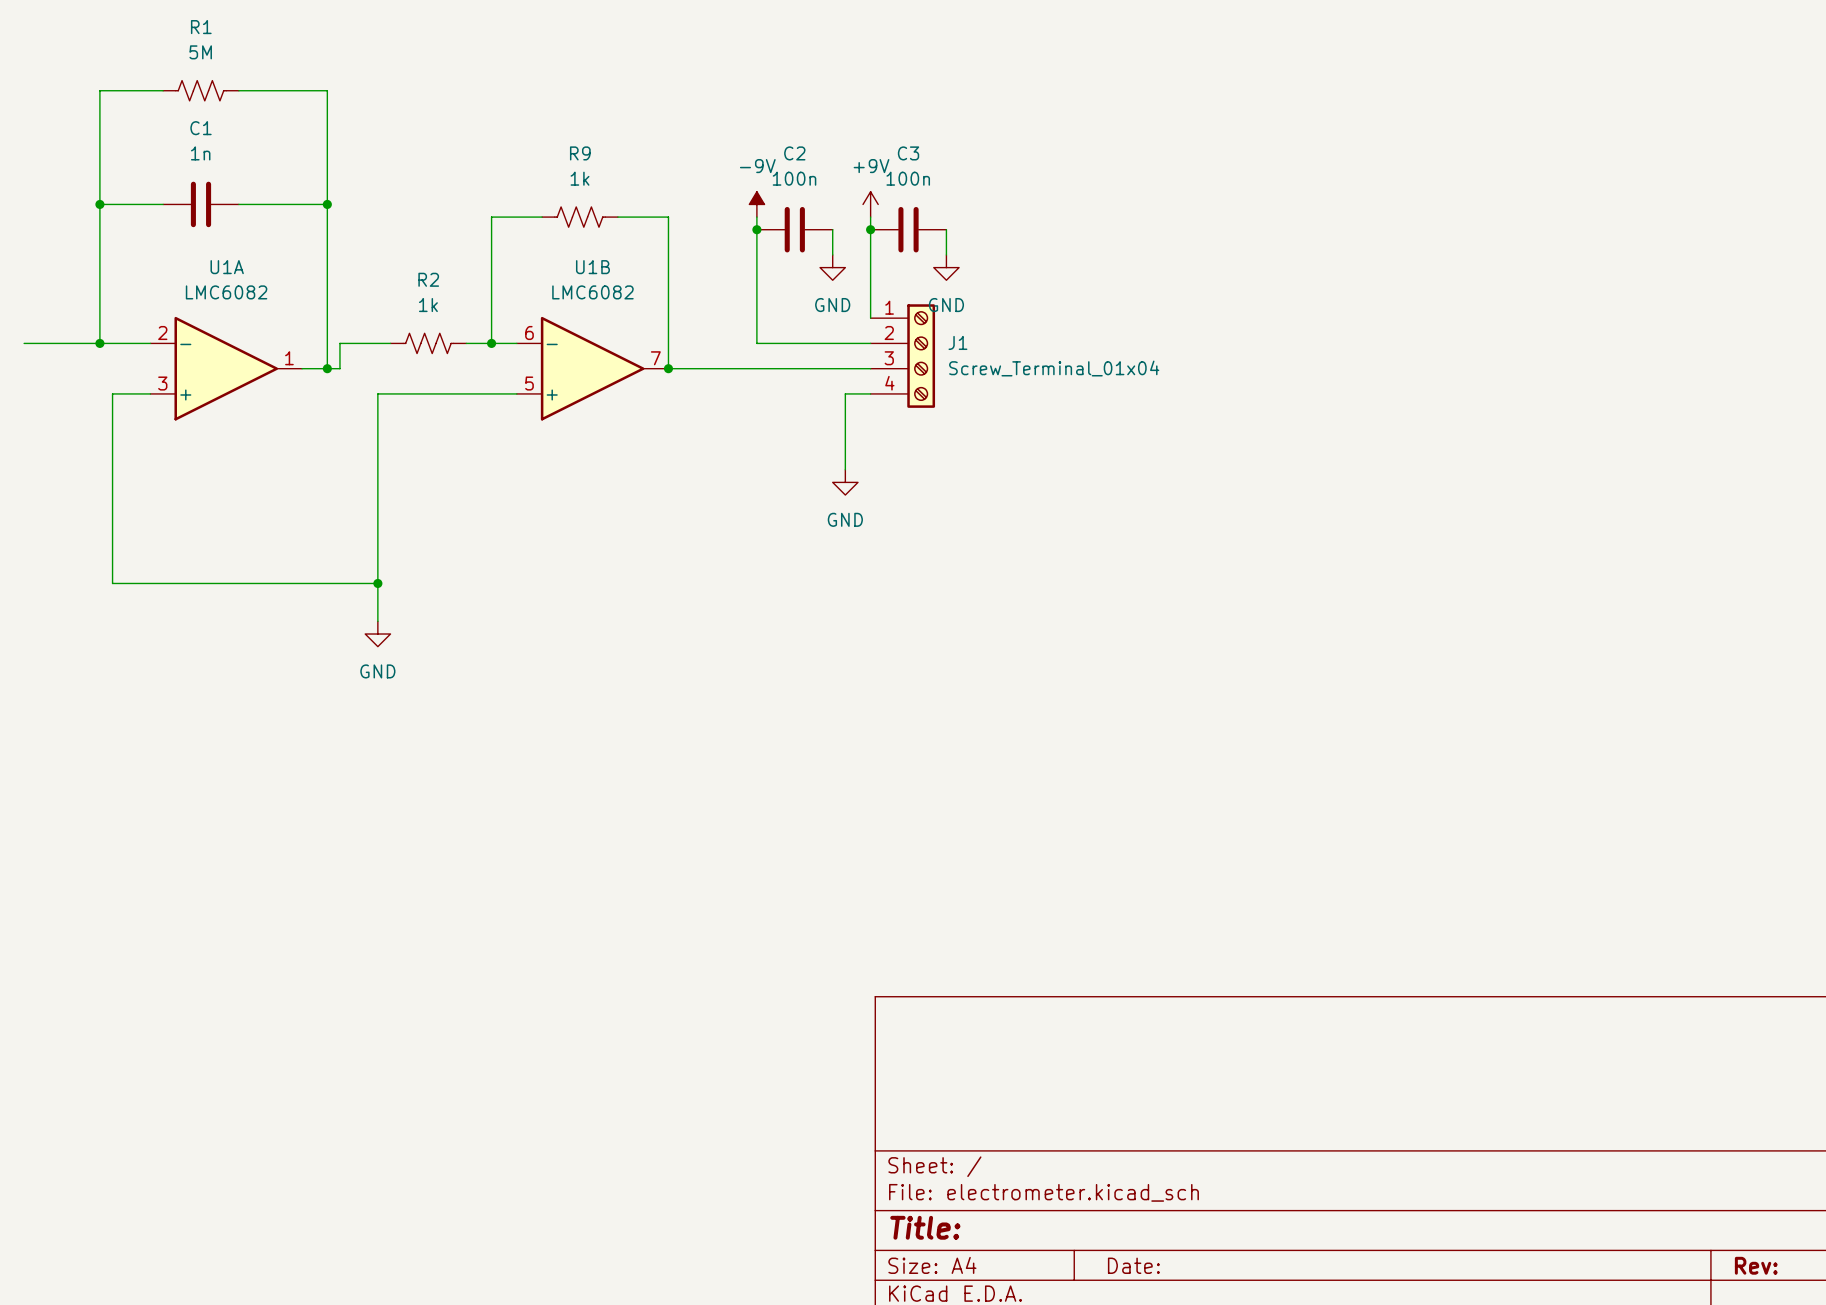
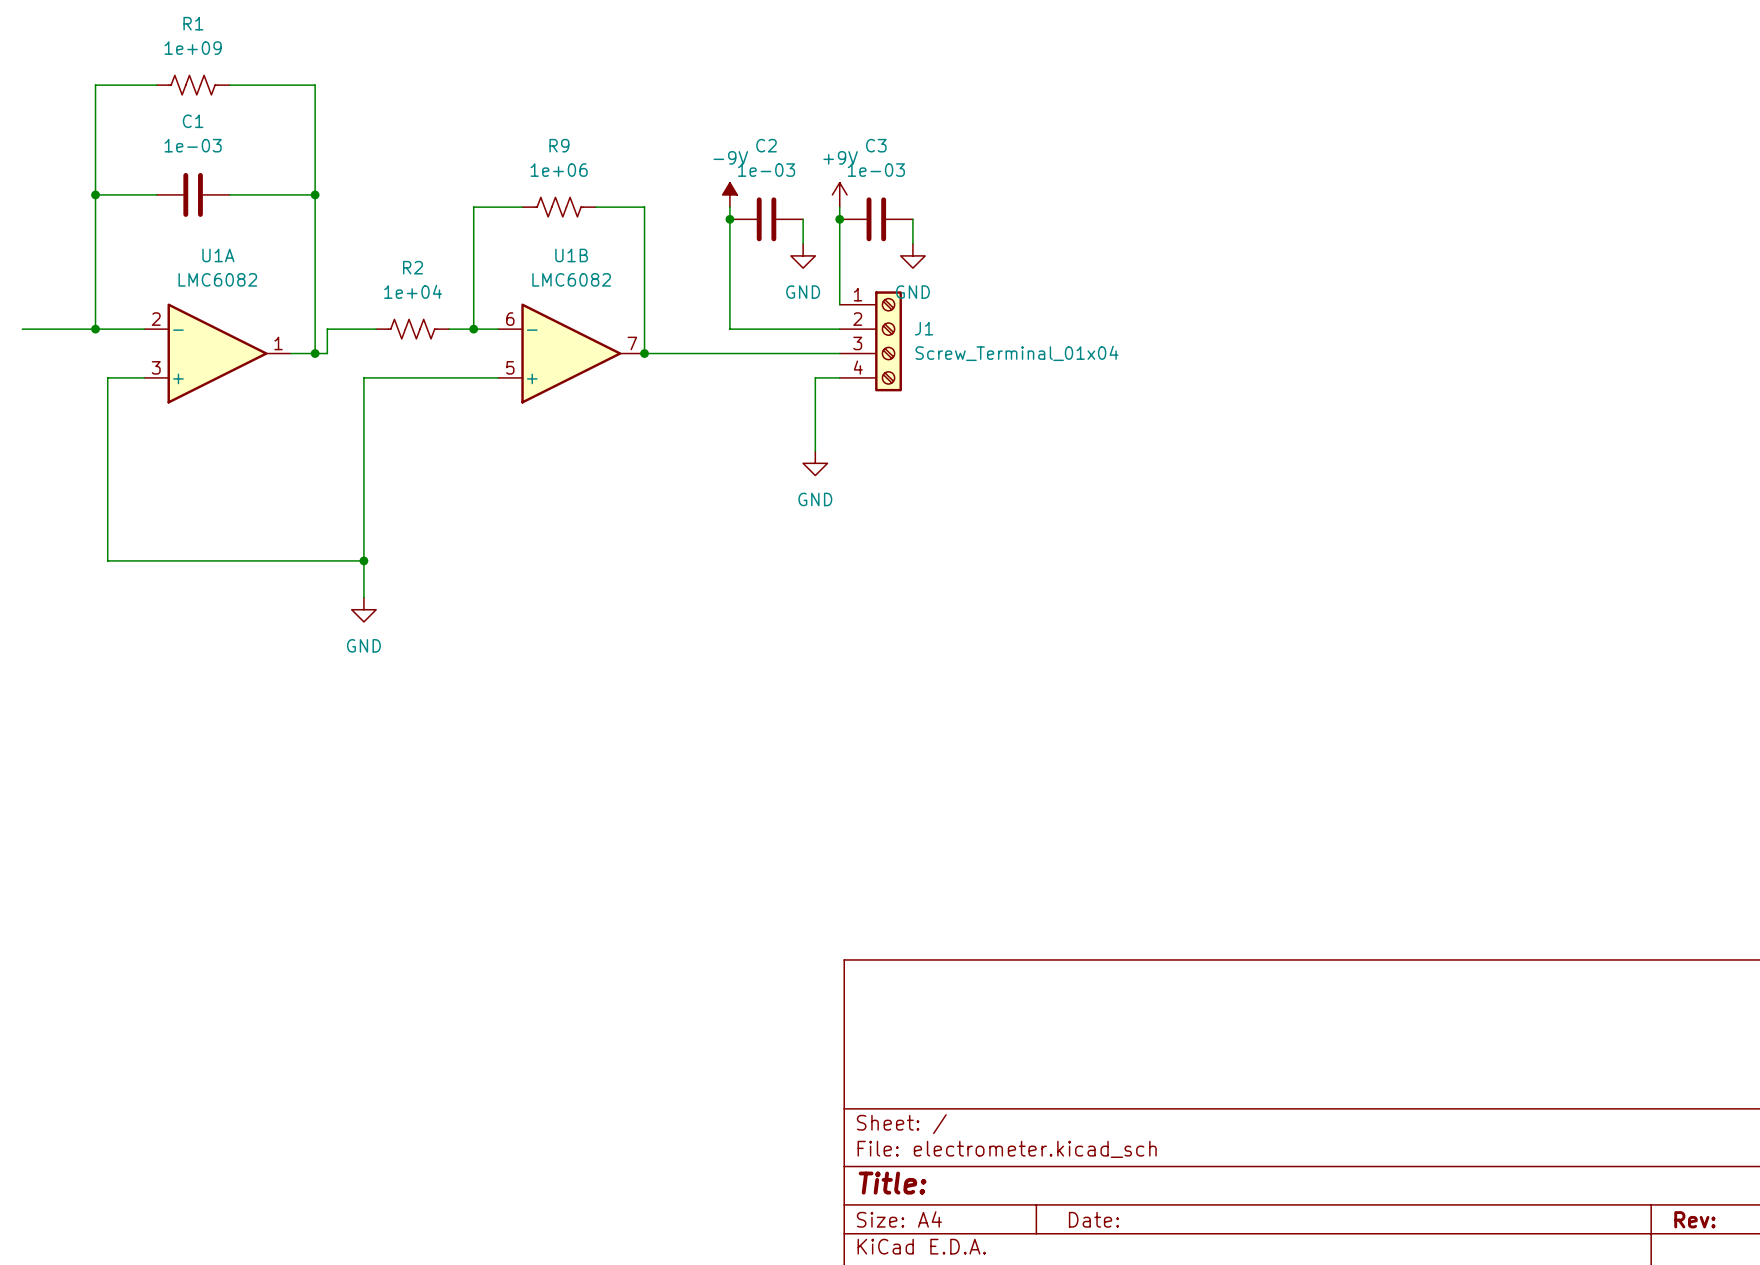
R1 value: 5M (200, 52) -> 1e+09 (193, 48)
C1 value: 1n (200, 153) -> 1e-03 (193, 145)
R9 value: 1k (580, 178) -> 1e+06 (559, 170)
C2 value: 100n (794, 178) -> 1e-03 (766, 170)
C3 value: 100n (908, 178) -> 1e-03 (876, 170)
R2 value: 1k (428, 305) -> 1e+04 (413, 291)

